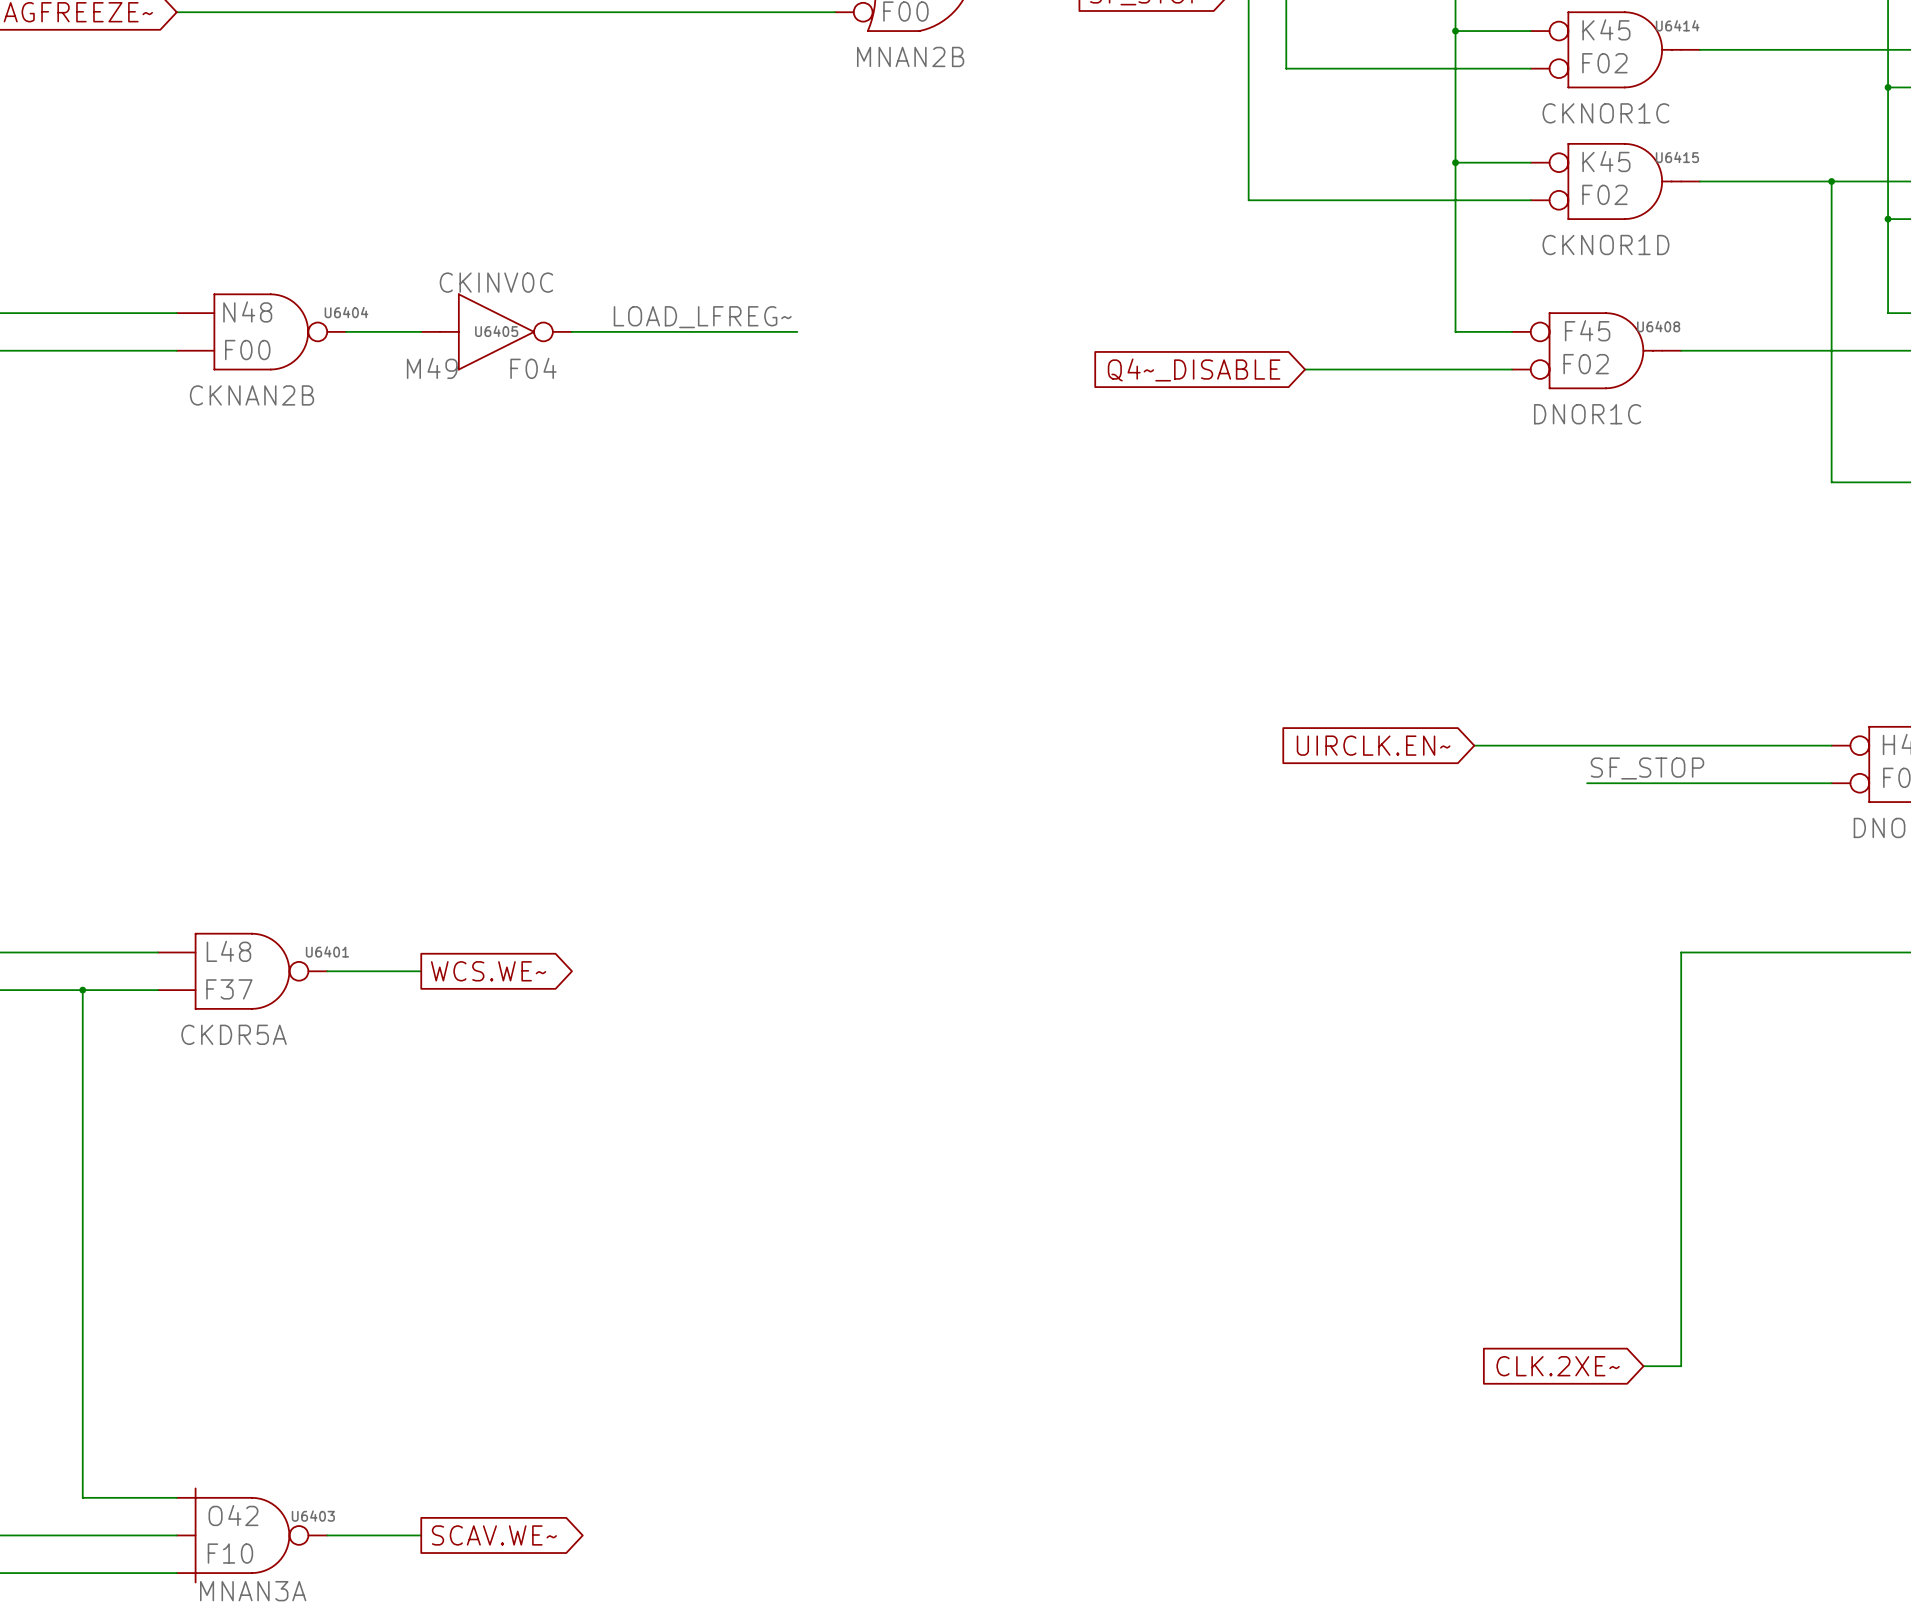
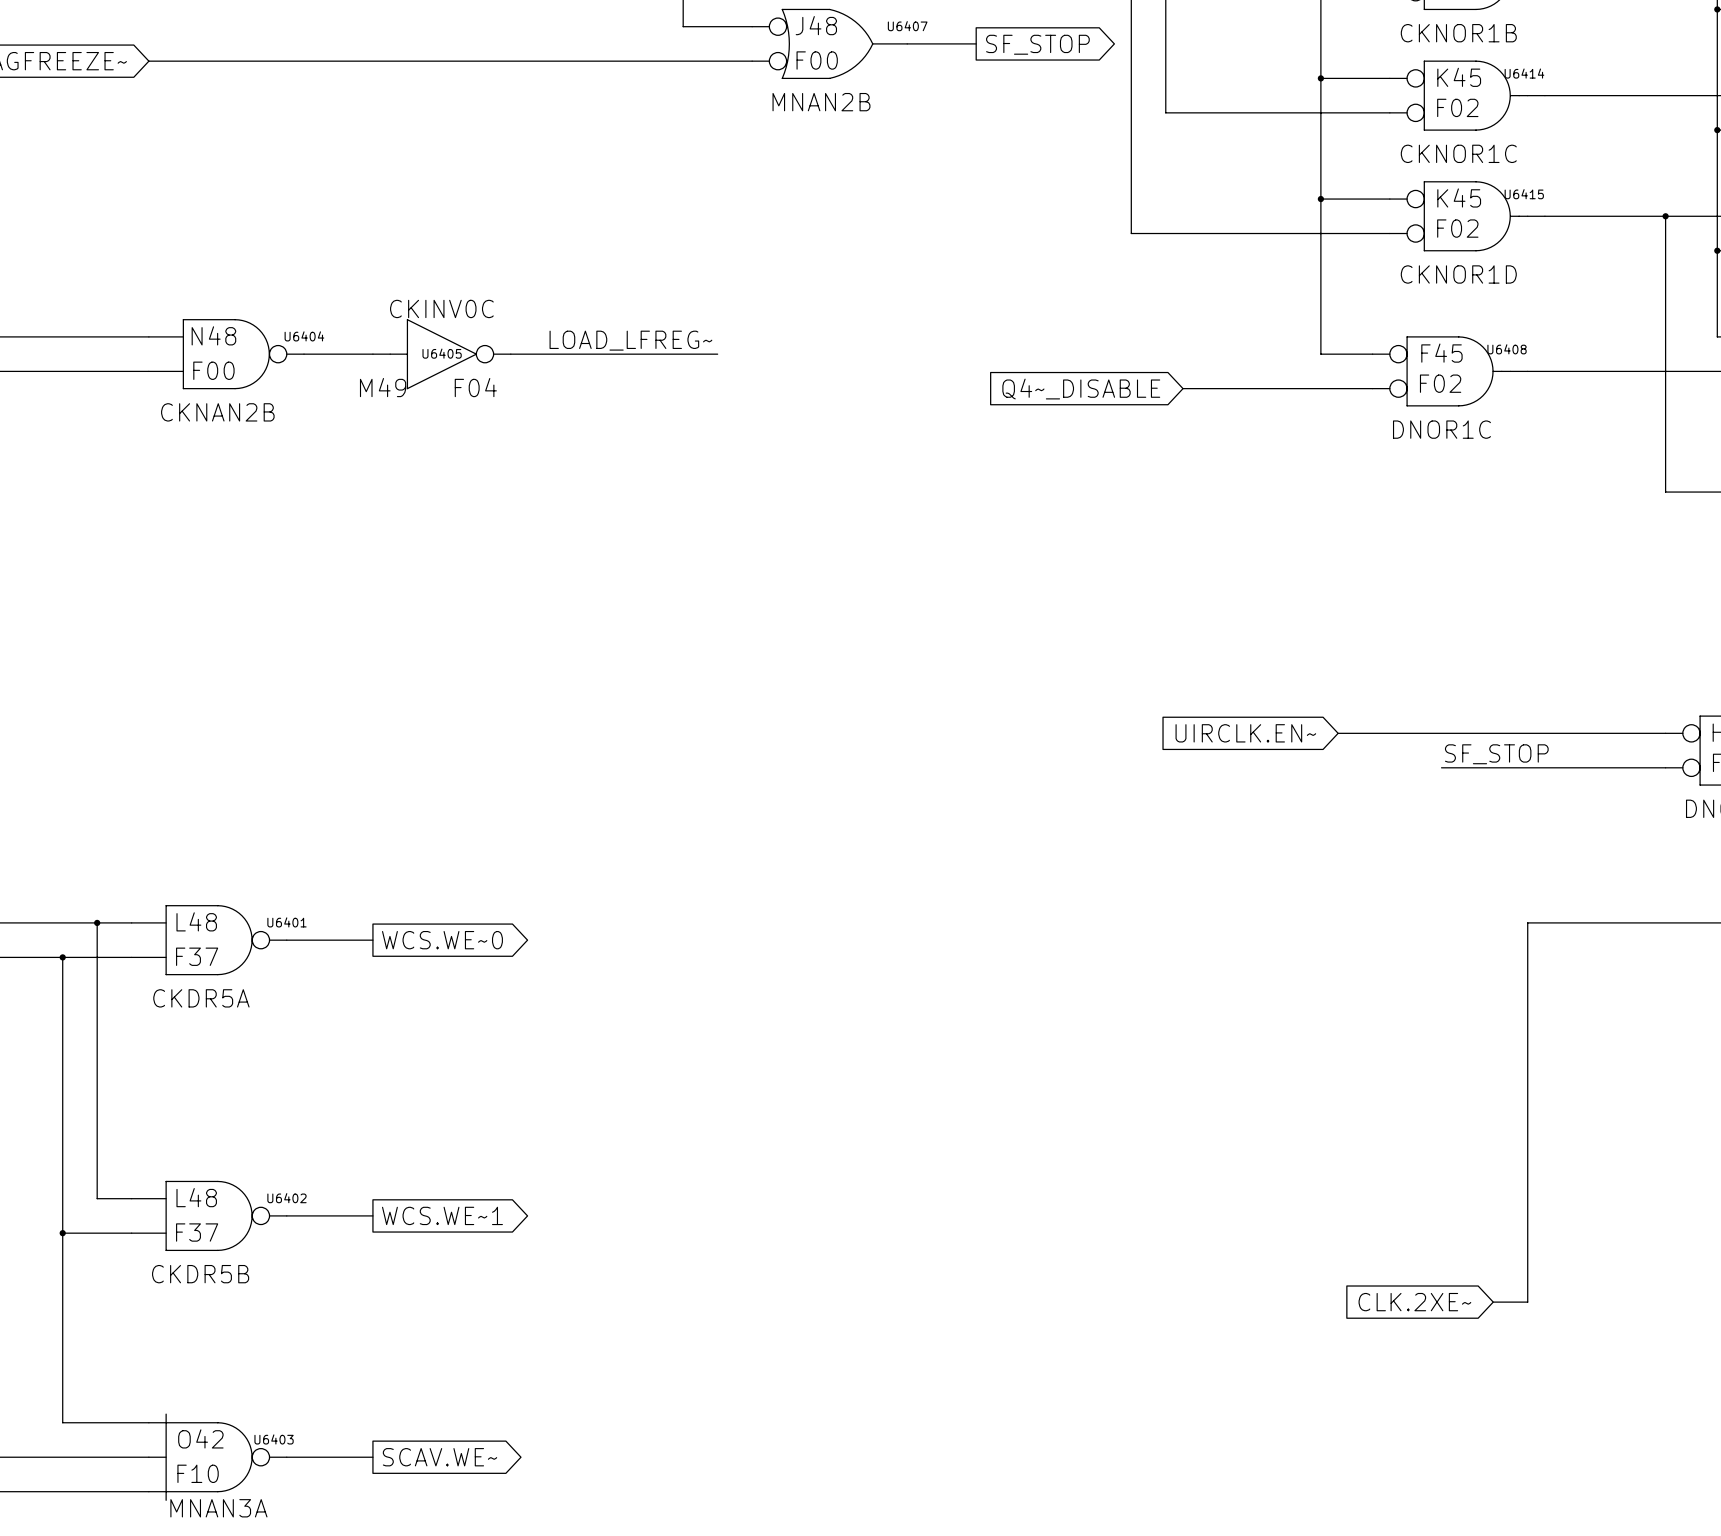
wire: none -> (97, 922) (97, 1198) (131, 1198)
junction: none -> (97, 922)
global label: WCS.WE~ (488, 971) -> WCS.WE~0 (442, 940)
U6402: none -> F37 (209, 1215)
wire: none -> (286, 1215) (372, 1215)
global label: none -> WCS.WE~1 (442, 1215)
wire: none -> (62, 1233) (131, 1233)
junction: none -> (62, 1233)

